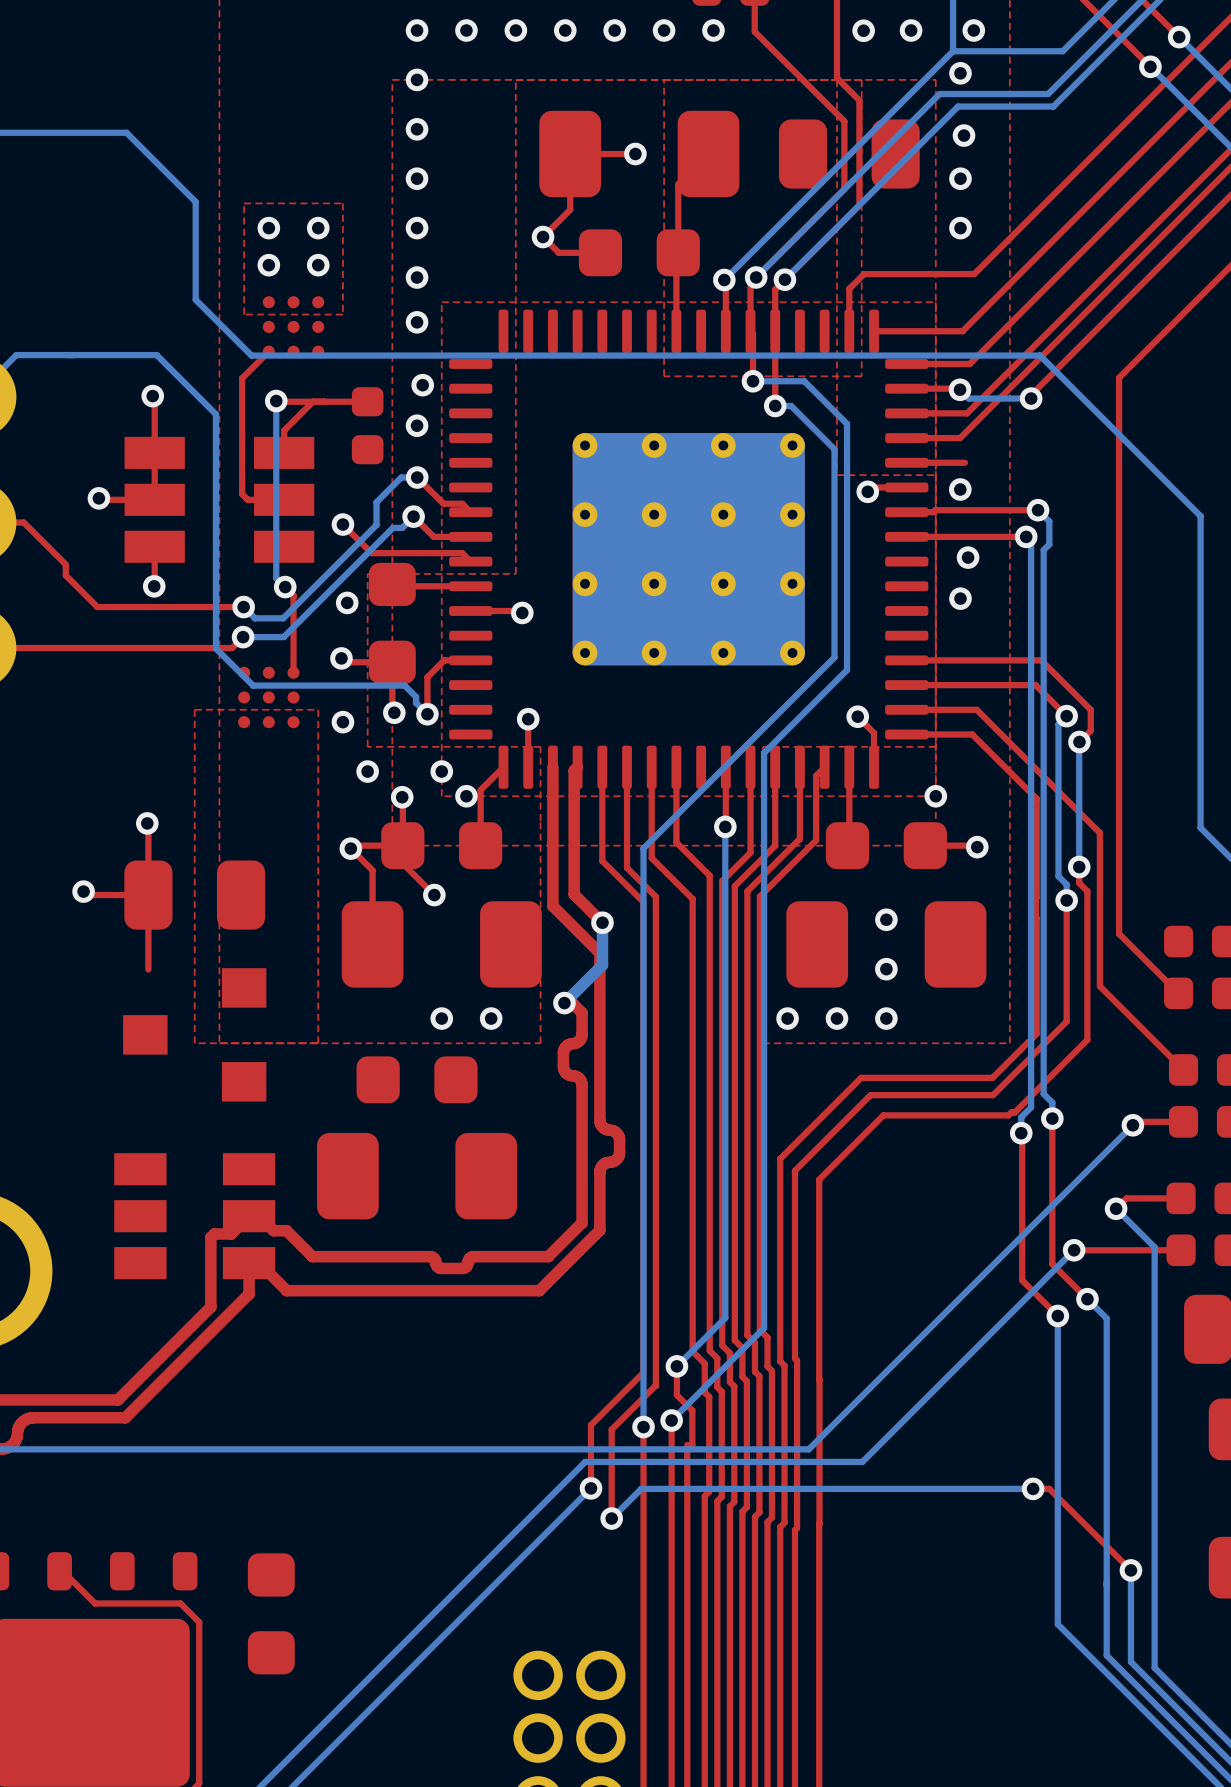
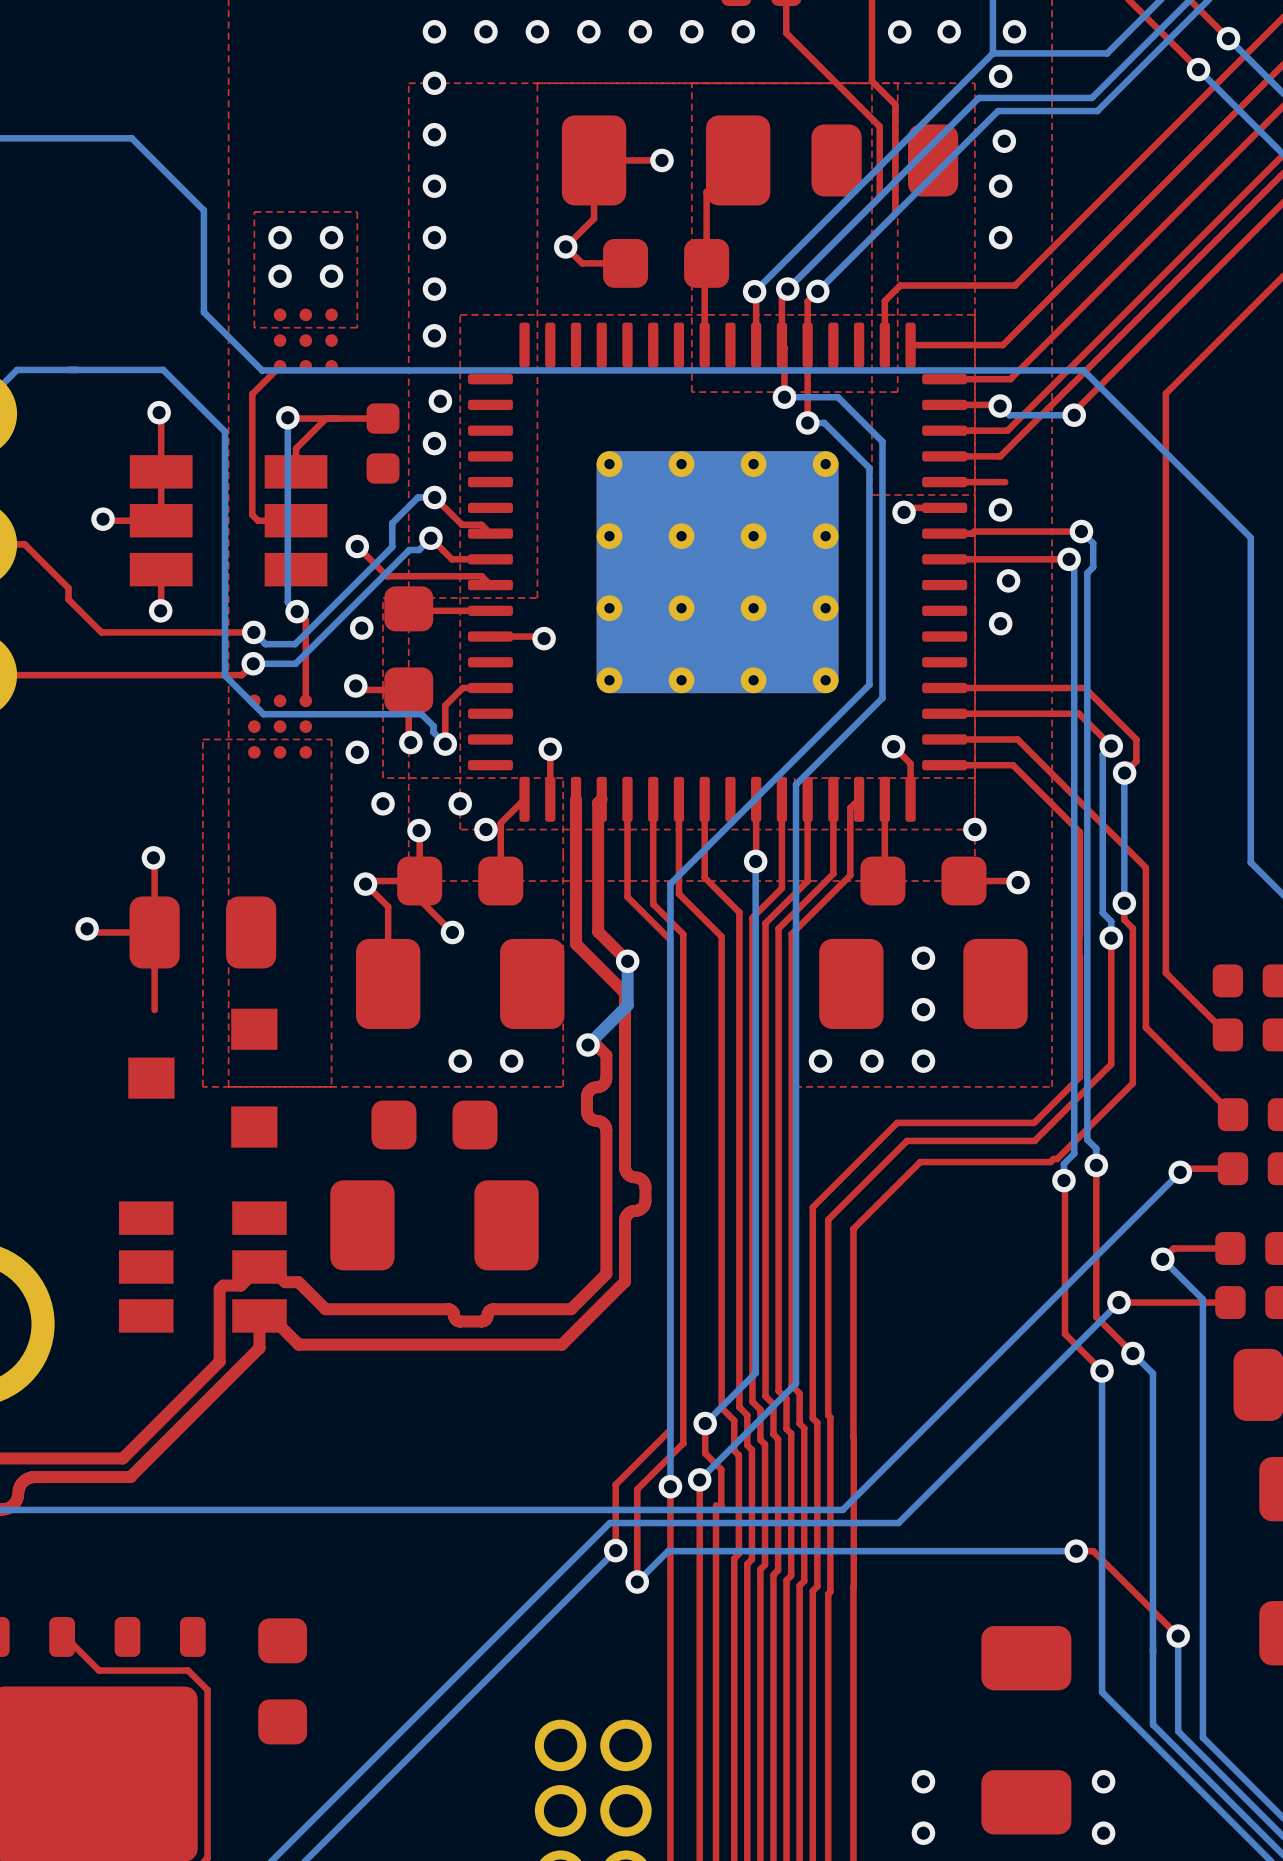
part: none -> (1026, 1730)
via: none -> (923, 1781)
via: none -> (1103, 1781)
via: none -> (923, 1833)
via: none -> (1103, 1833)

